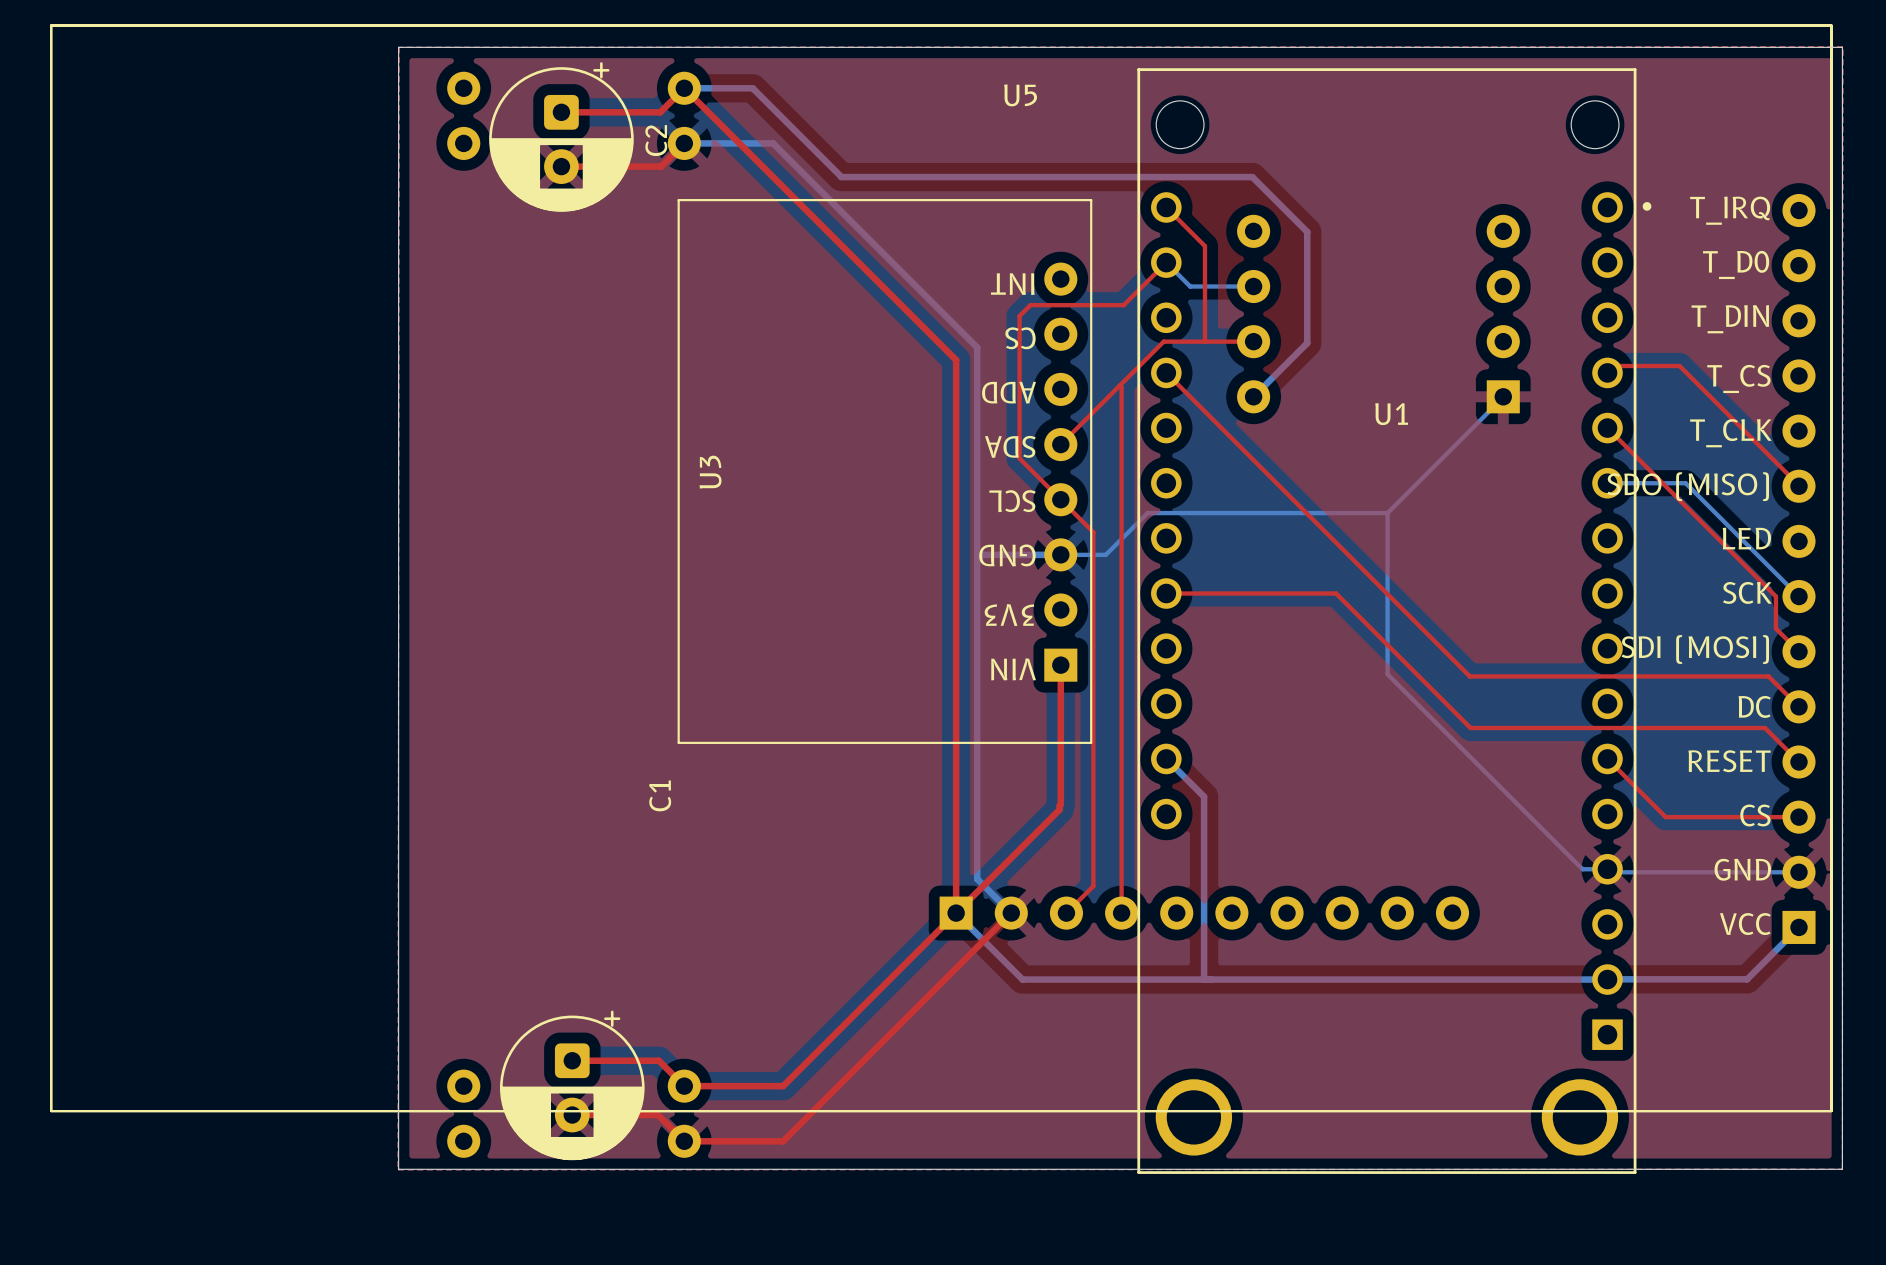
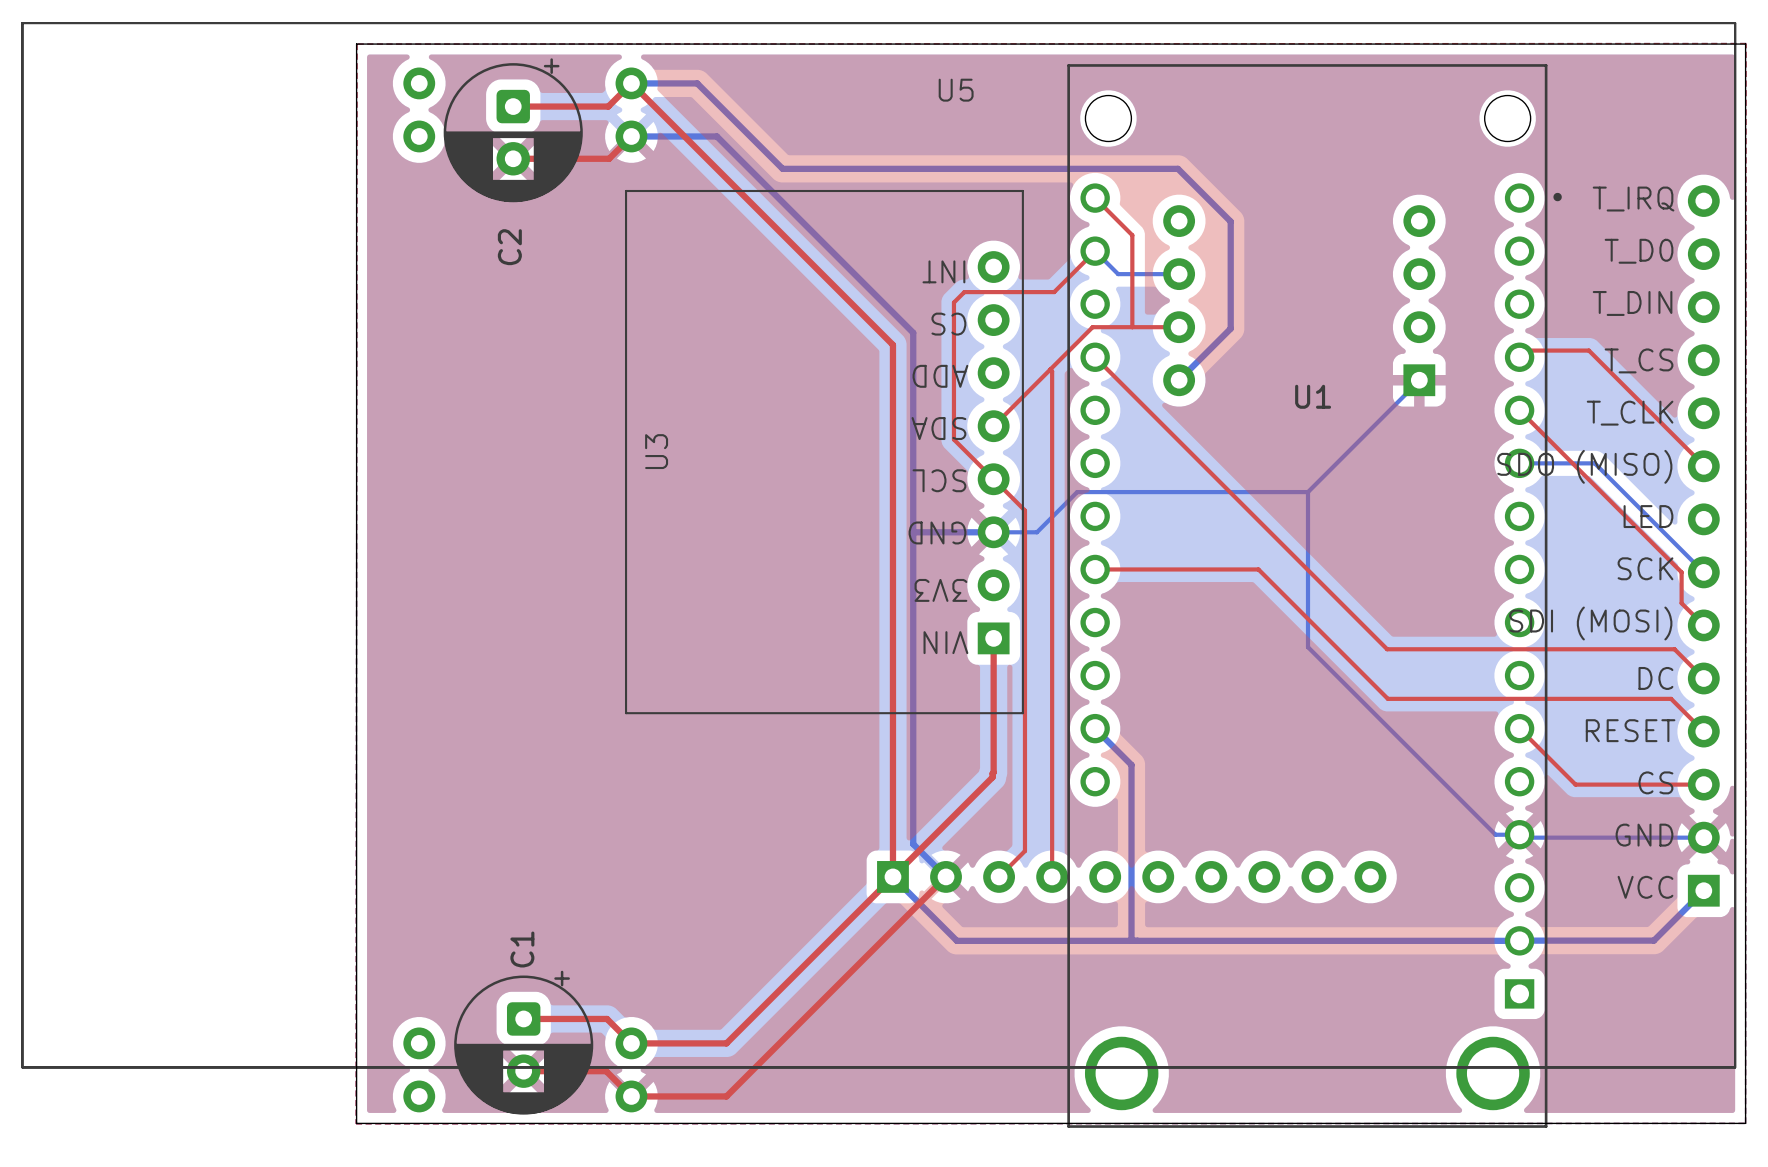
C2 name position: C2 (656, 140) -> C2 (509, 247)
C1 name position: C1 (660, 795) -> C1 (522, 949)

